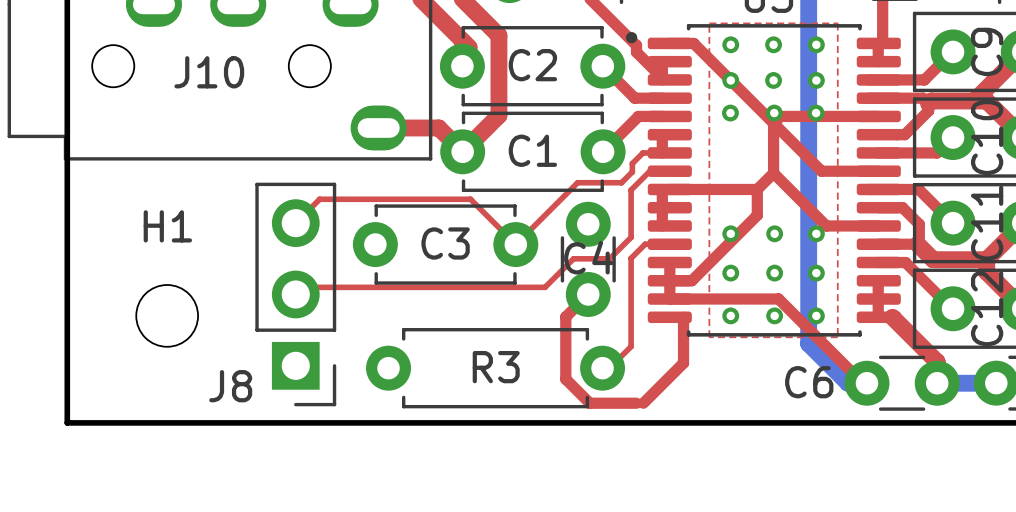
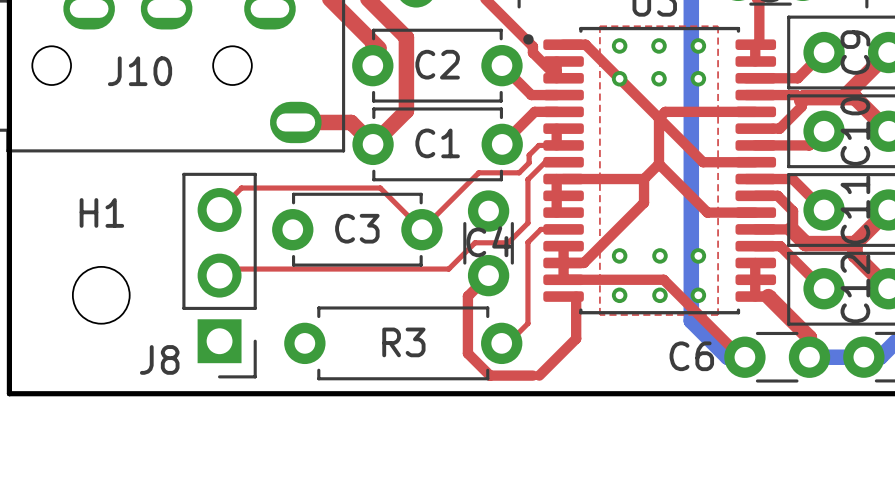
via: (730, 113) -> none
via: (774, 113) -> none
via: (816, 113) -> none
via: (730, 233) -> none
via: (774, 233) -> none
via: (816, 233) -> none

